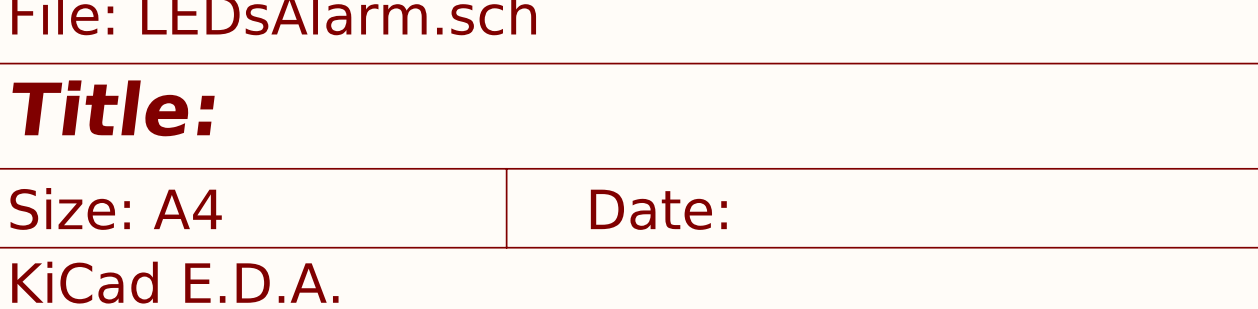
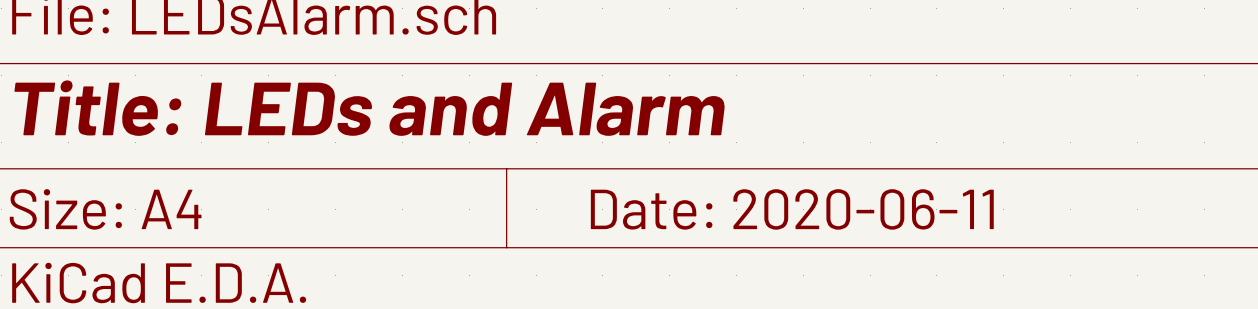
title block: Title: (113, 108) -> Title: LEDs and Alarm (369, 108)
title block: Date: (658, 209) -> Date: 2020-06-11 (792, 209)

